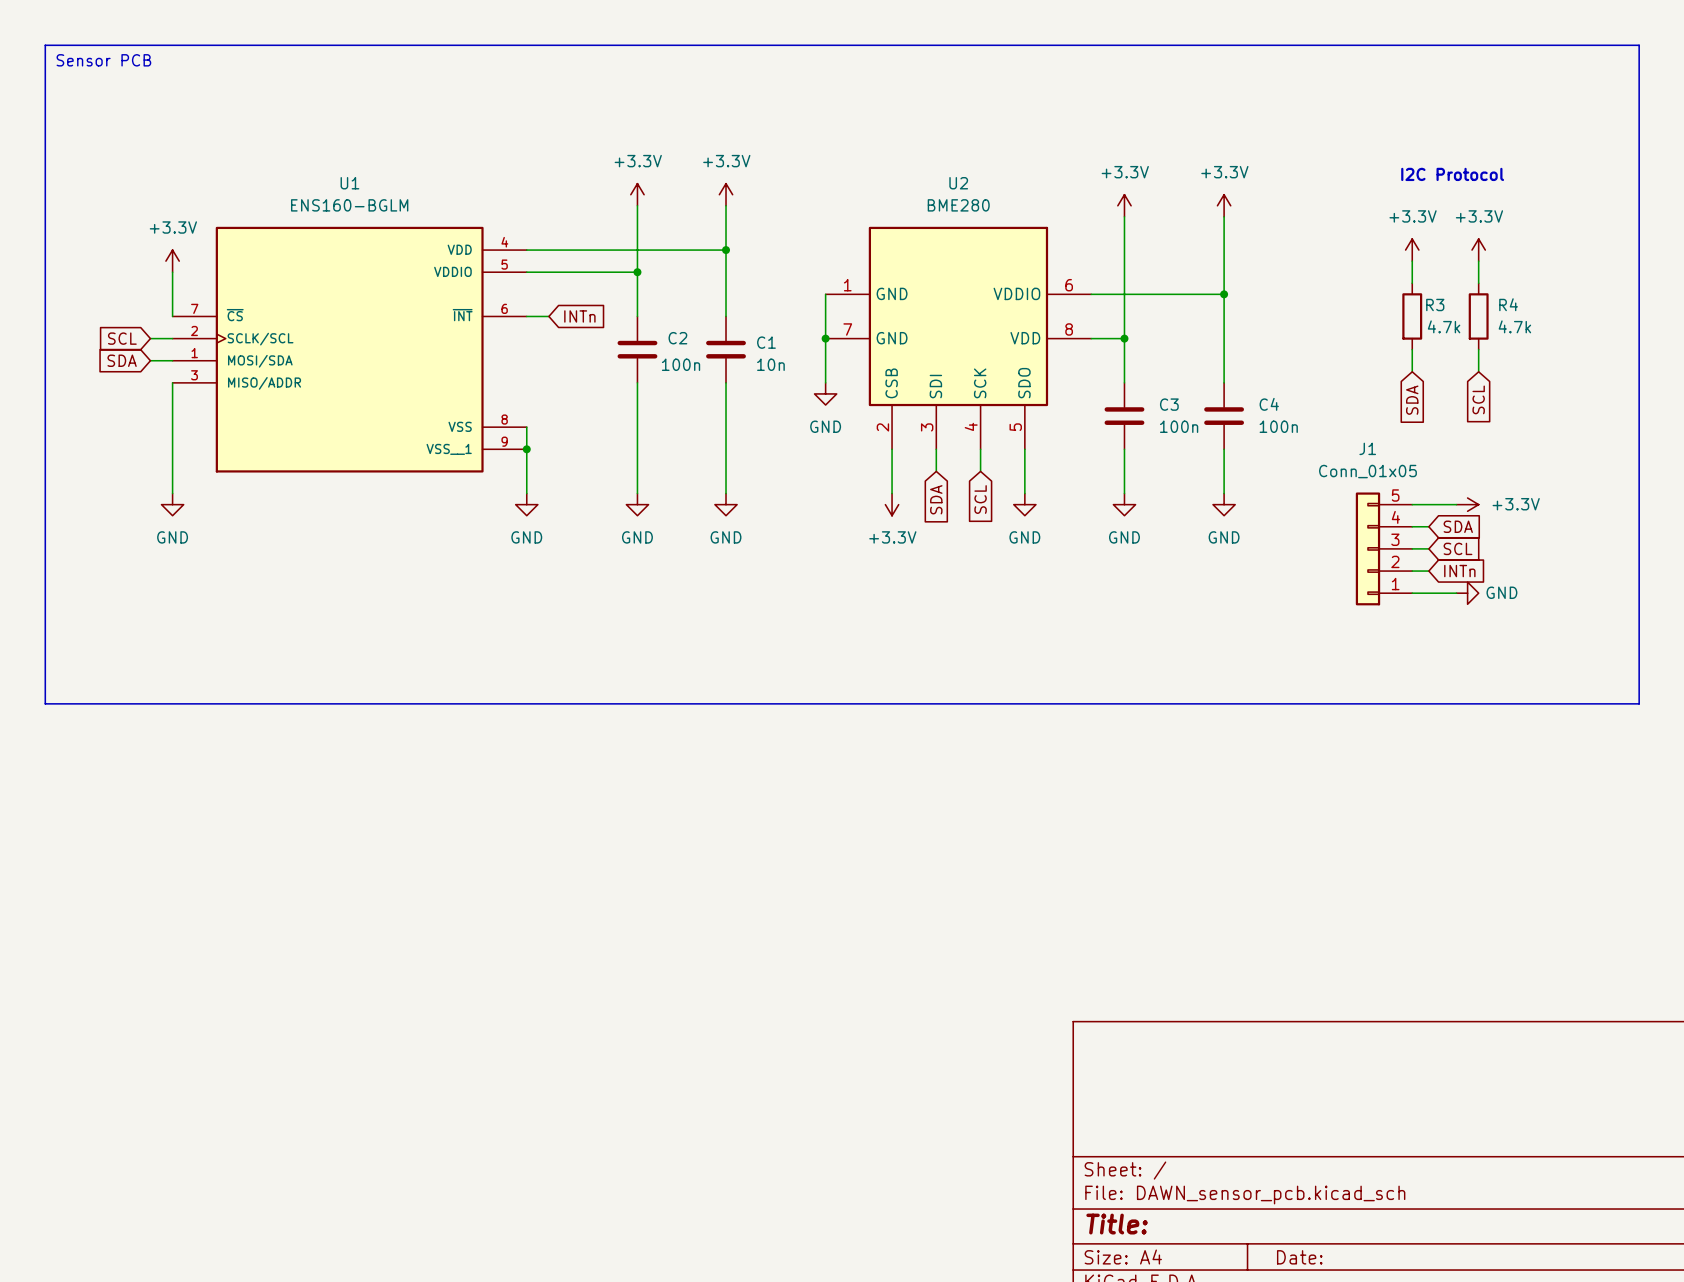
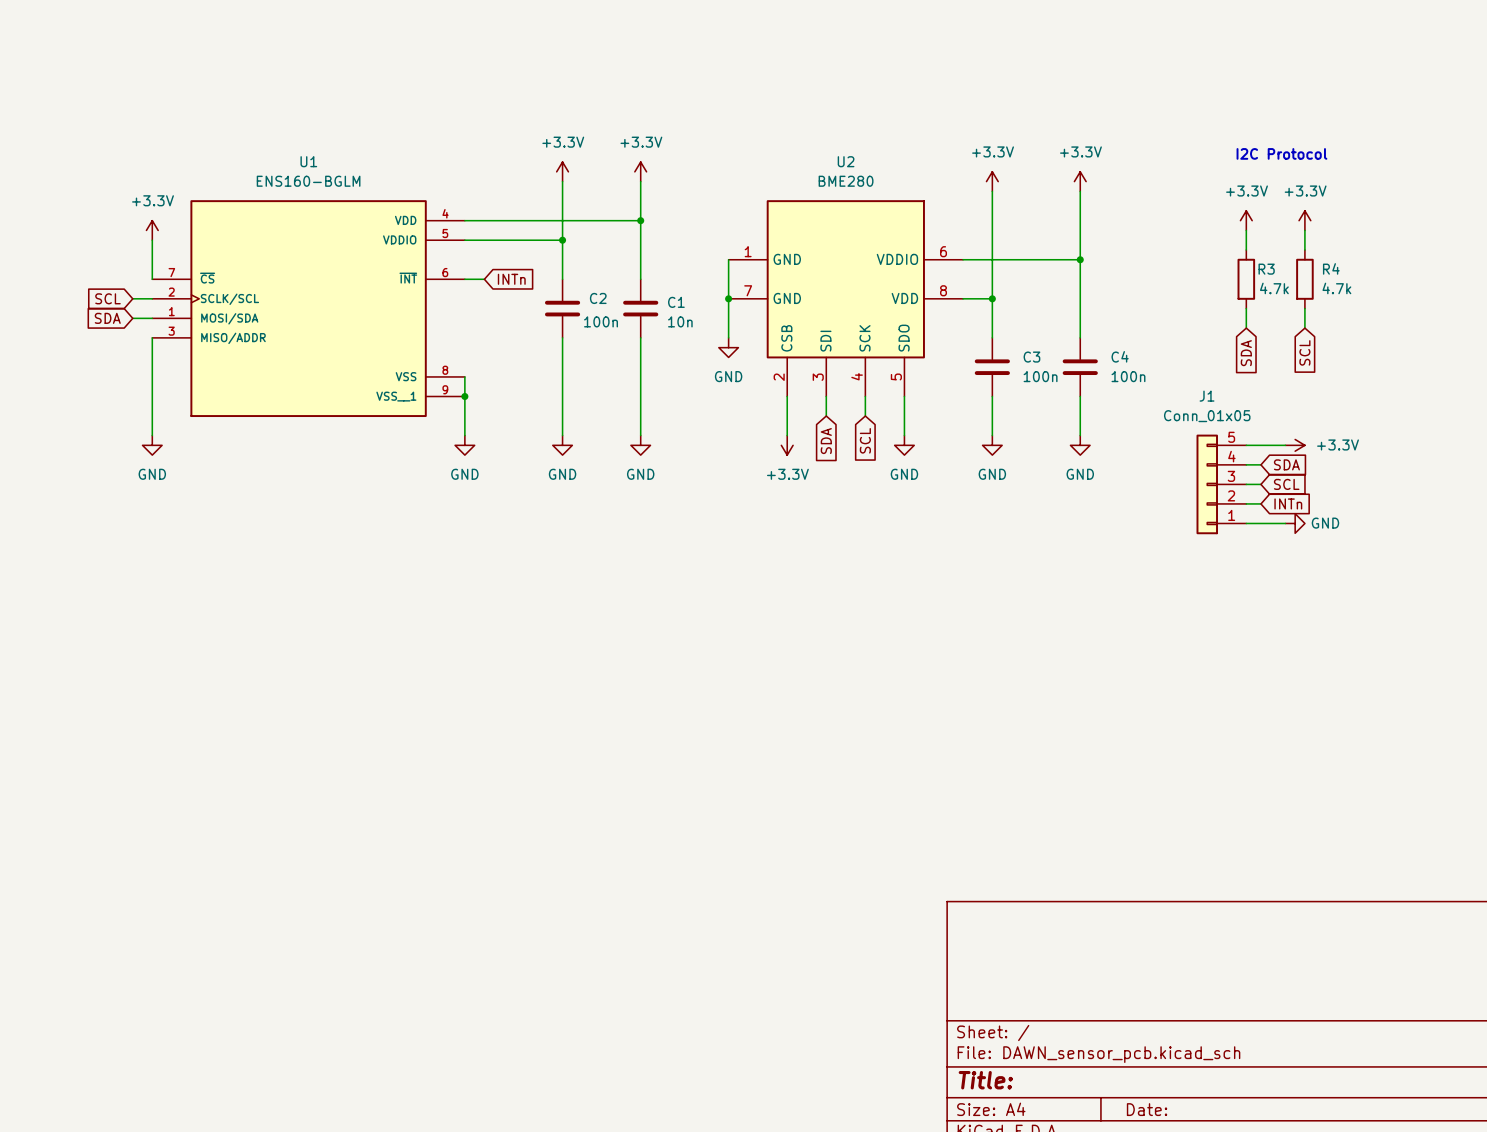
line: (45, 45) (1639, 45) (1639, 703) (45, 703) (45, 45) -> none
text: Sensor PCB (103, 60) -> none

